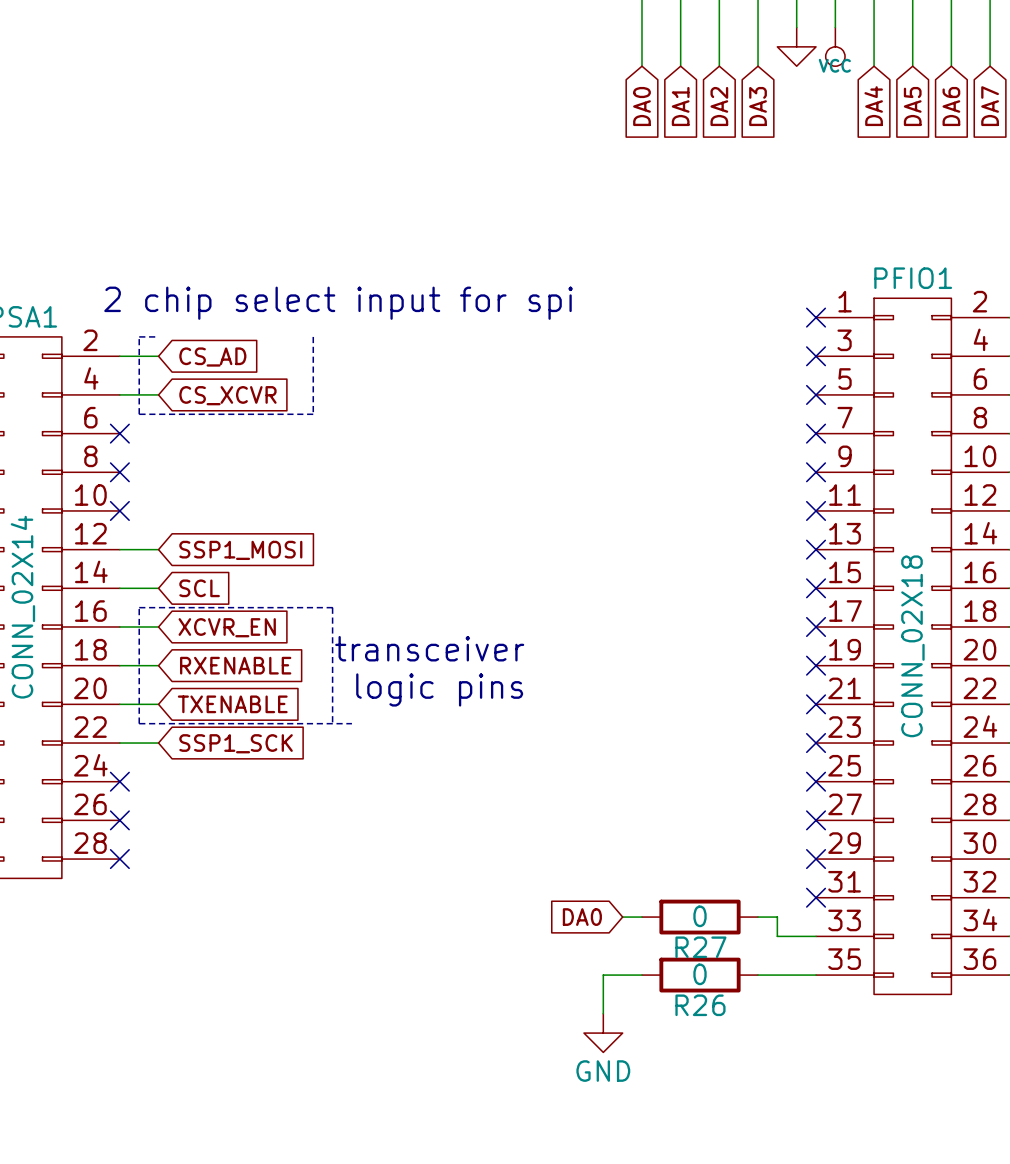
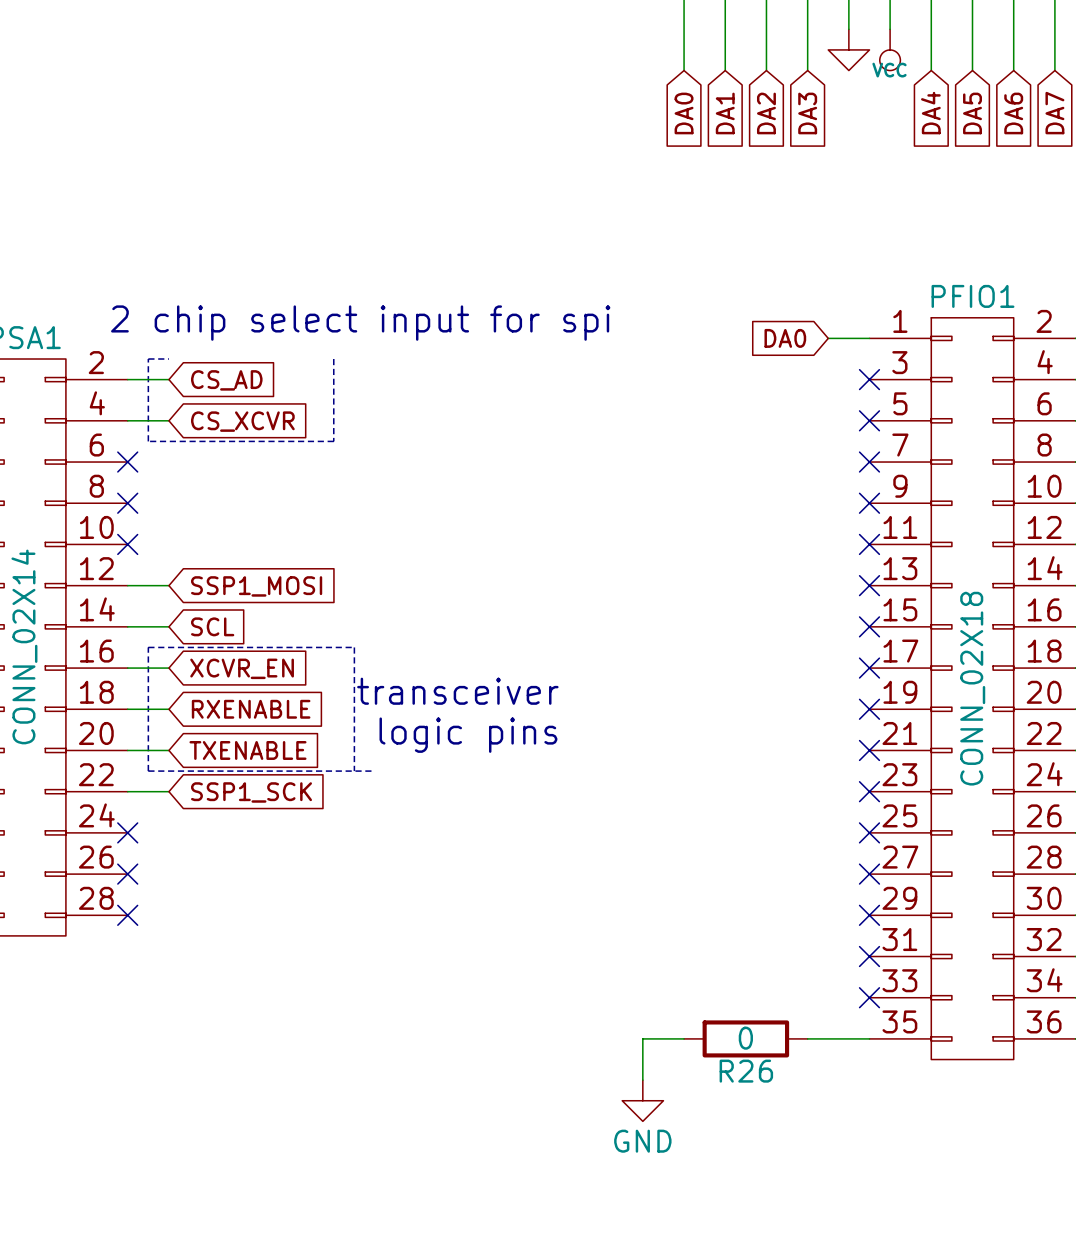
global label: none -> DA0 (785, 338)
wire: none -> (828, 338) (869, 338)
no-connect mark: (816, 317) -> none
global label: DA0 (582, 917) -> none
wire: (622, 917) (641, 917) -> none
R27: 0 (700, 917) -> none
wire: (758, 917) (777, 917) (777, 936) (816, 936) -> none
no-connect mark: none -> (869, 997)

